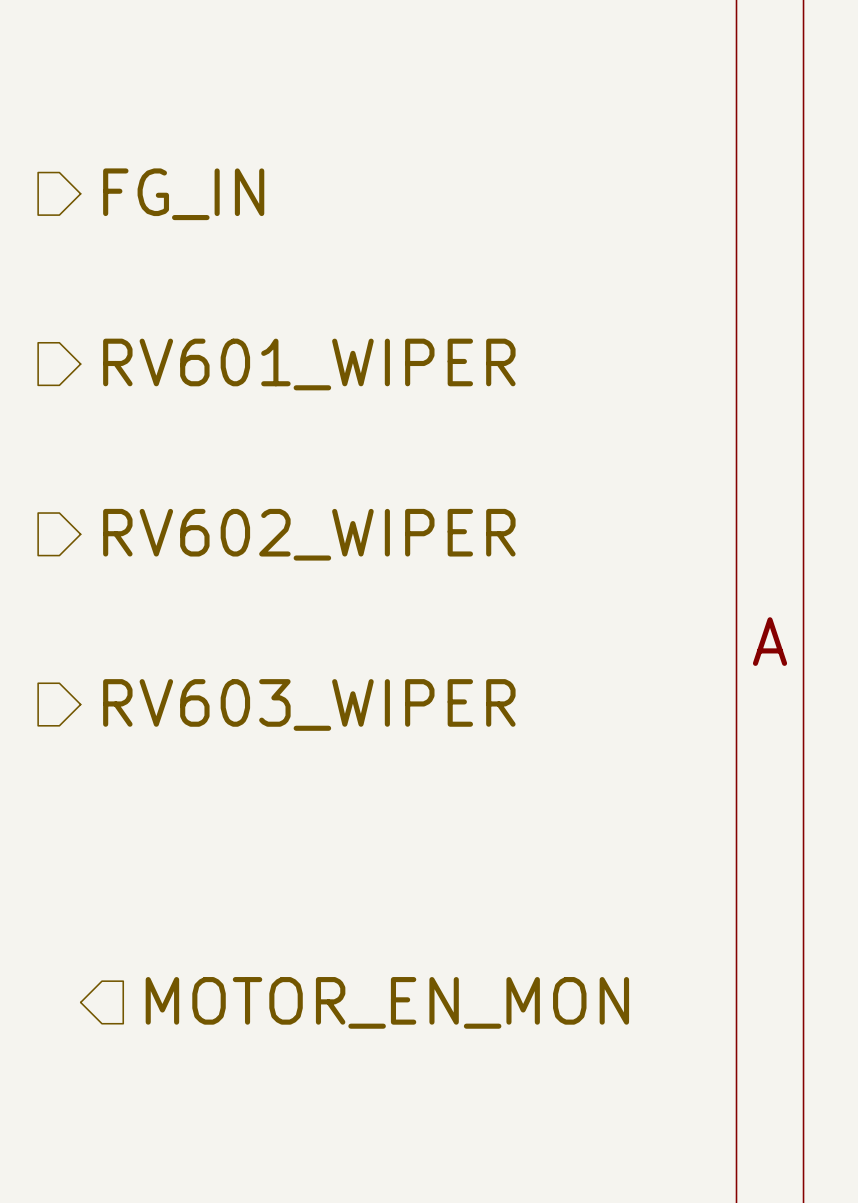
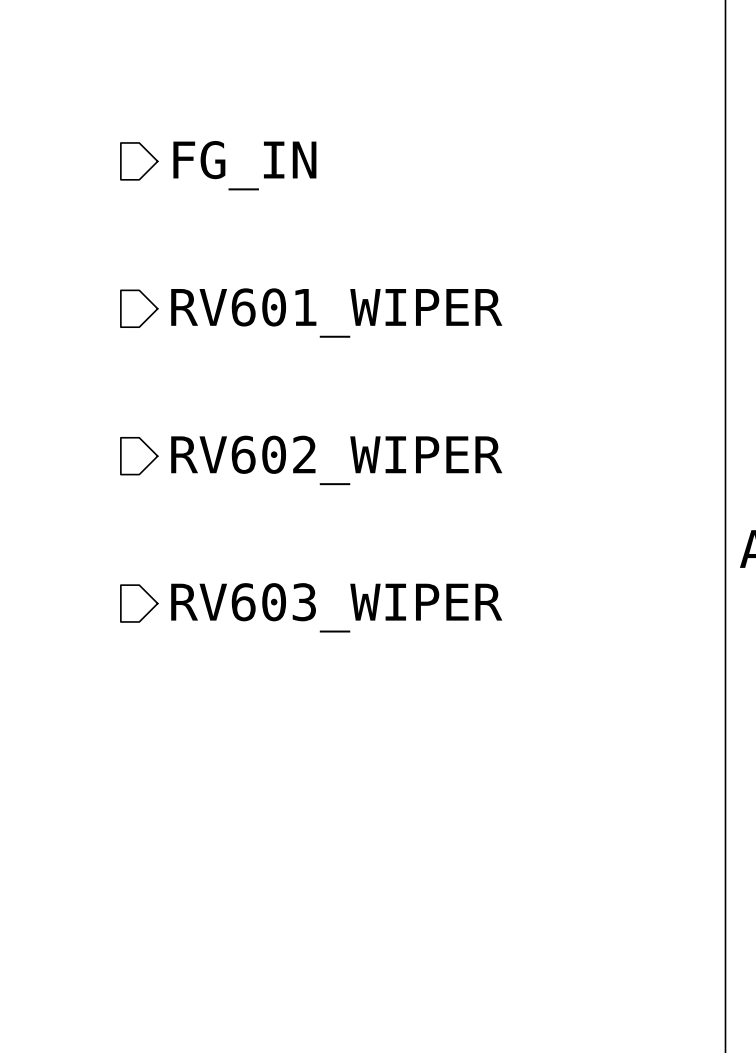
hierarchical label: MOTOR_EN_MON (387, 1002) -> none

